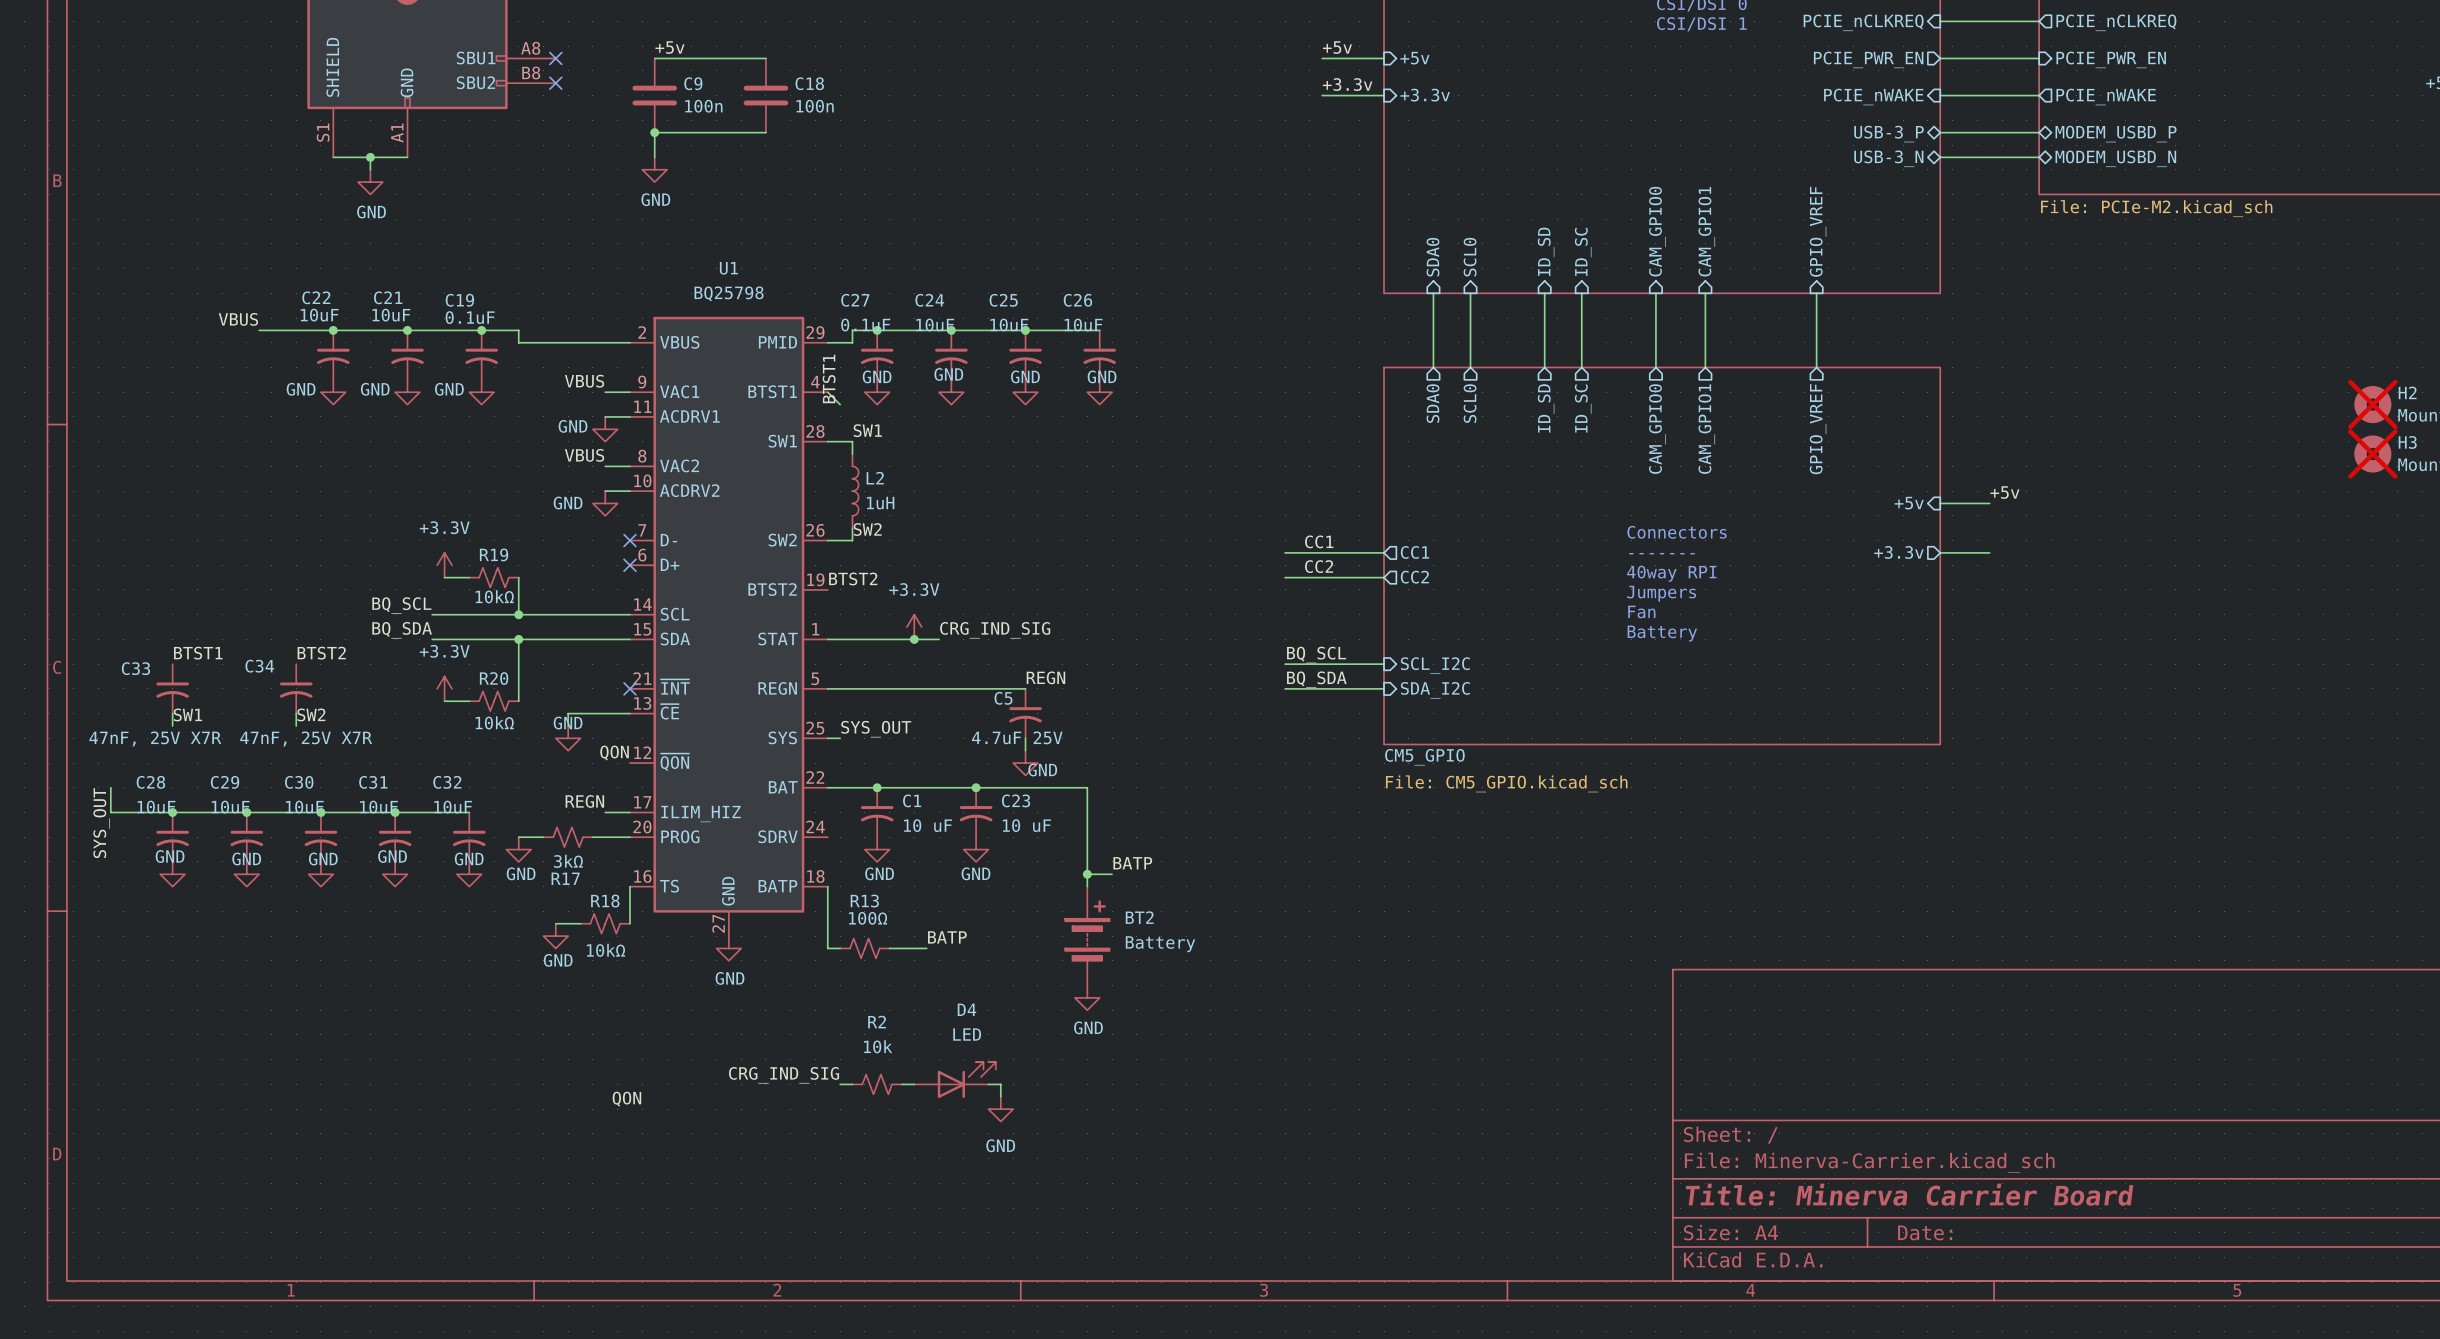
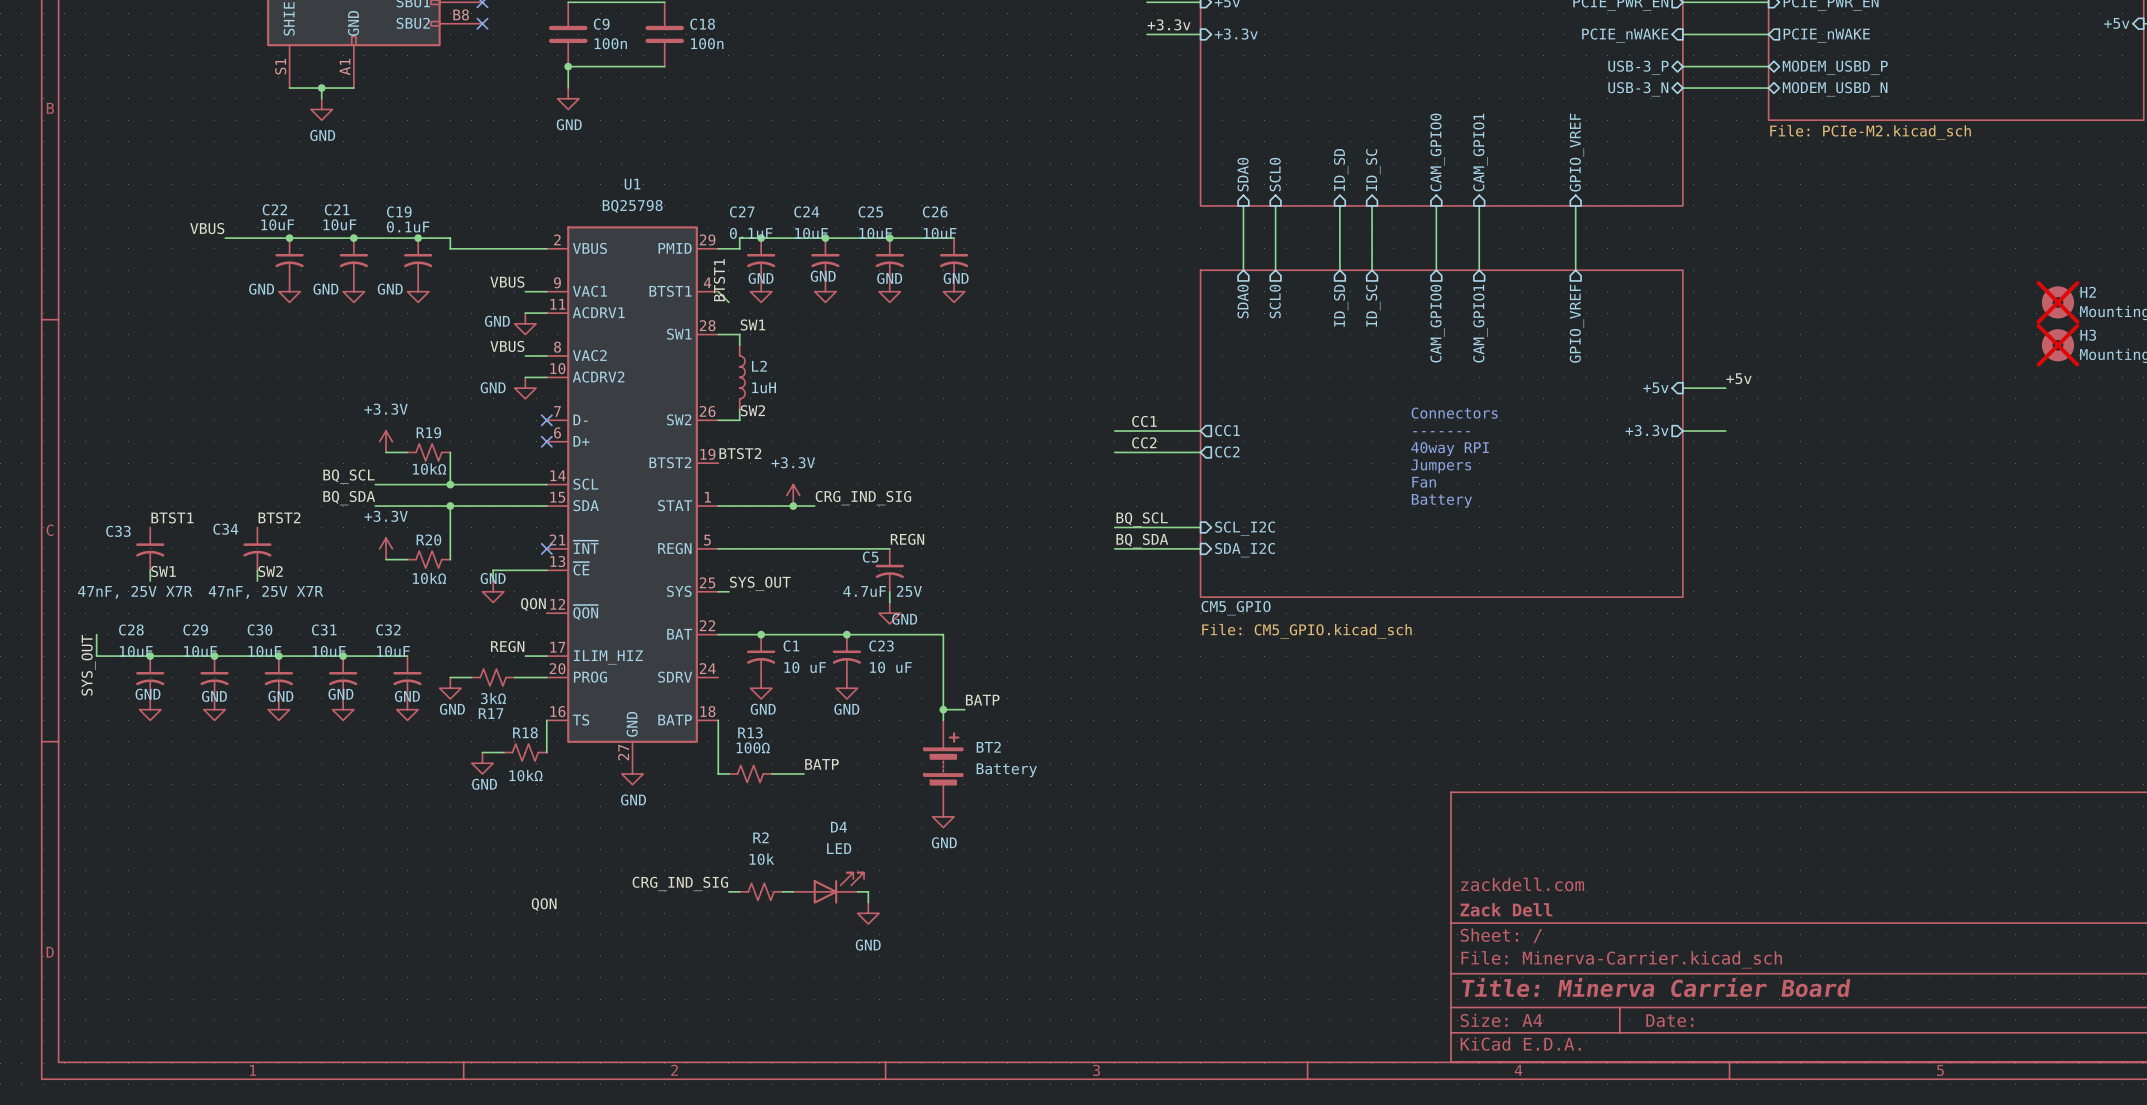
title block: none -> zackdell.com (1522, 884)
title block: none -> Zack Dell (1506, 909)

